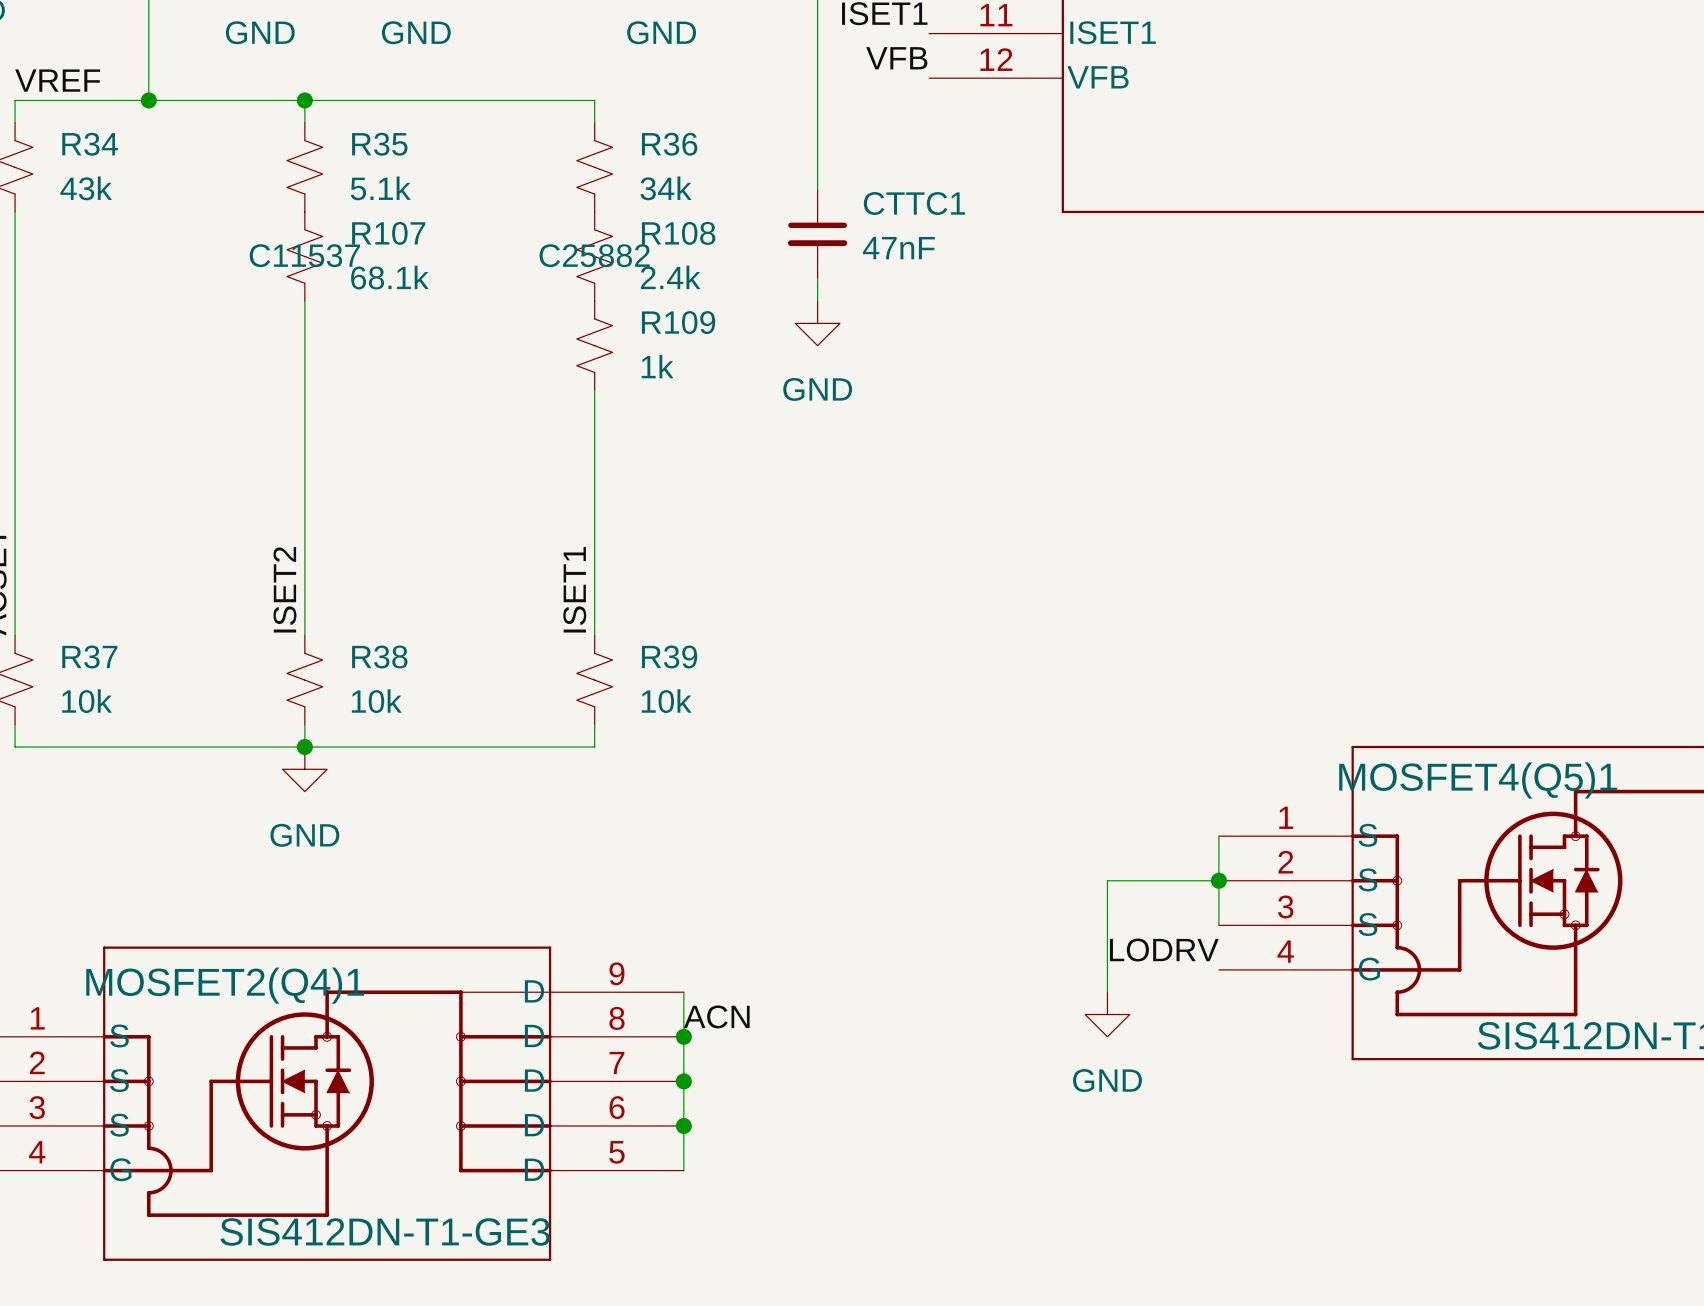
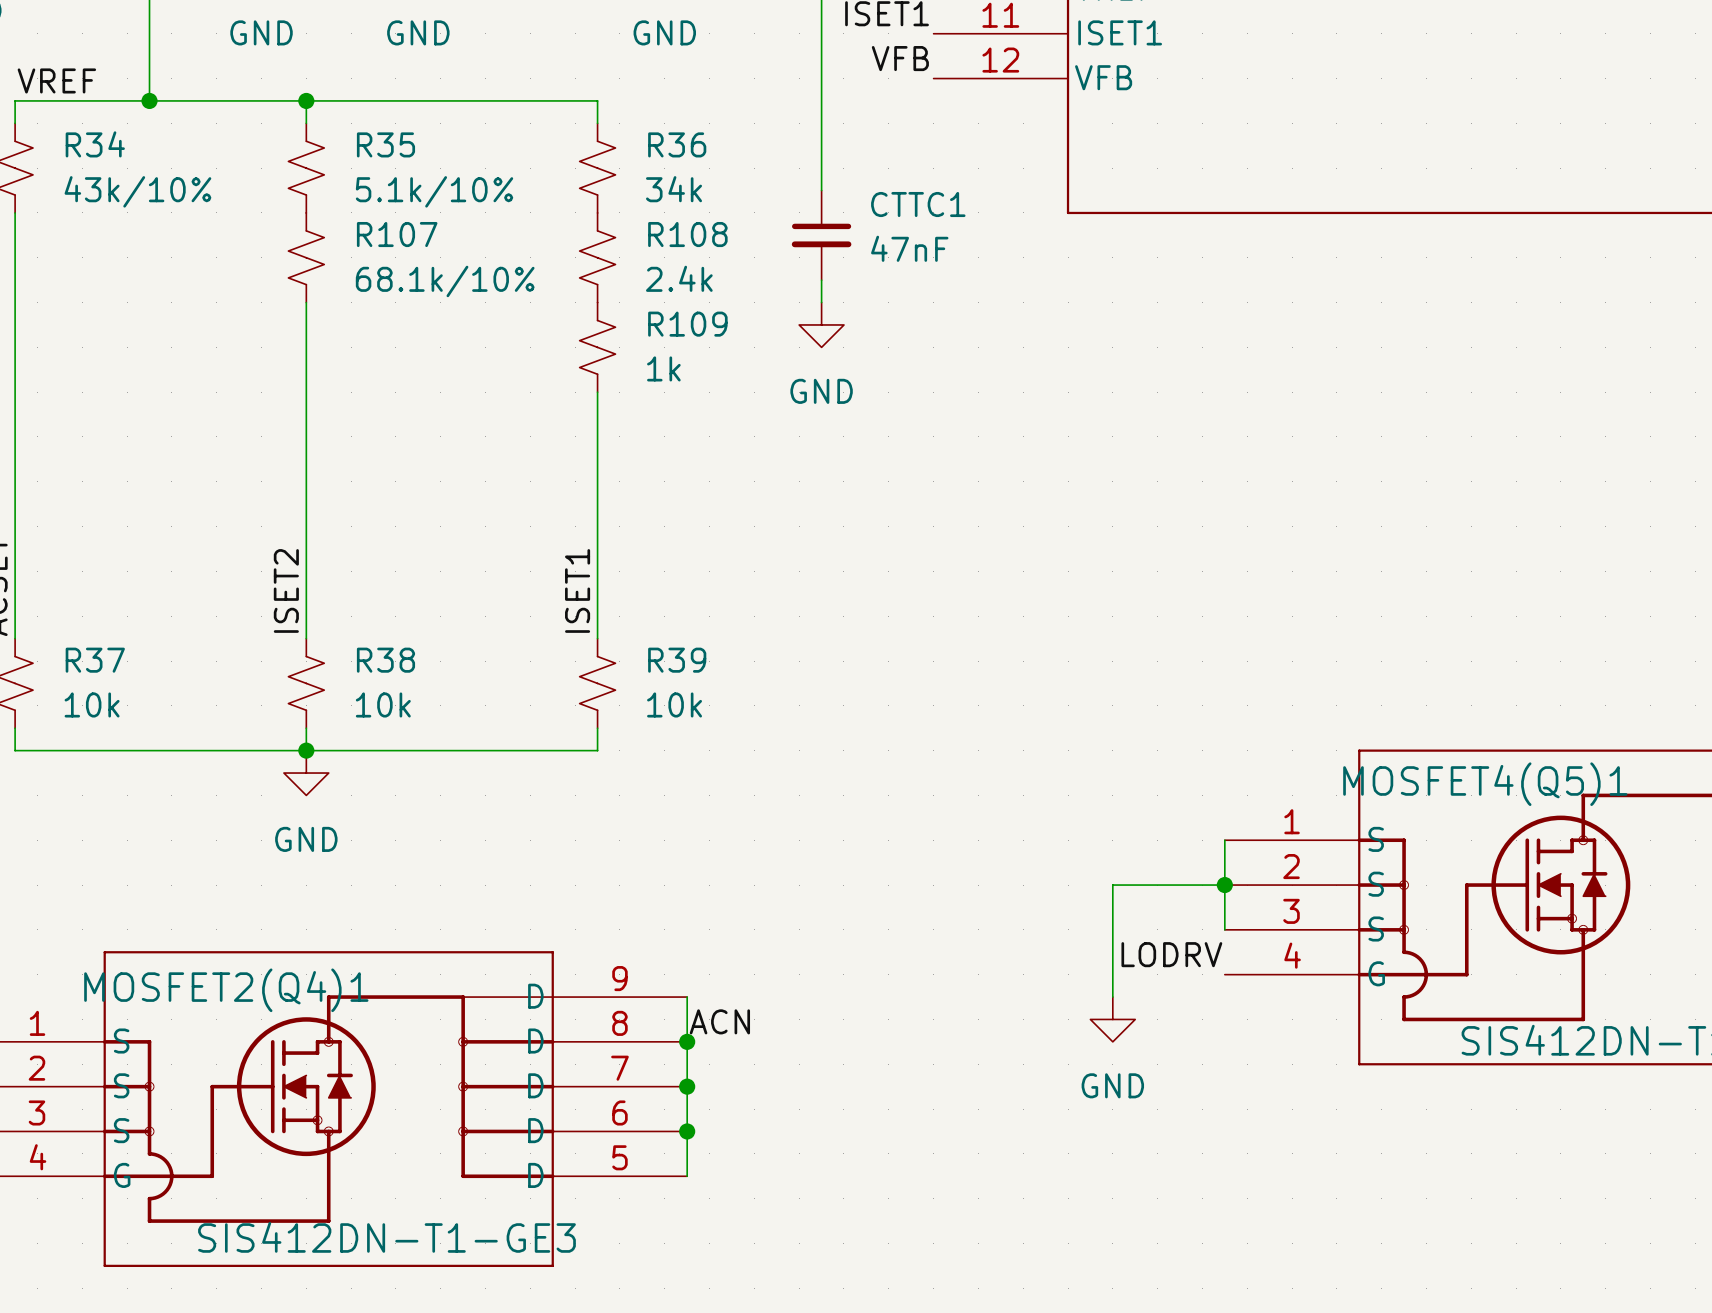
R34 value: 43k (86, 188) -> 43k/10% (137, 191)
R35 value: 5.1k (380, 188) -> 5.1k/10% (434, 191)
R107 text: C11537 (304, 255) -> none
R108 text: C25882 (594, 255) -> none
R107 value: 68.1k (389, 277) -> 68.1k/10% (445, 281)

